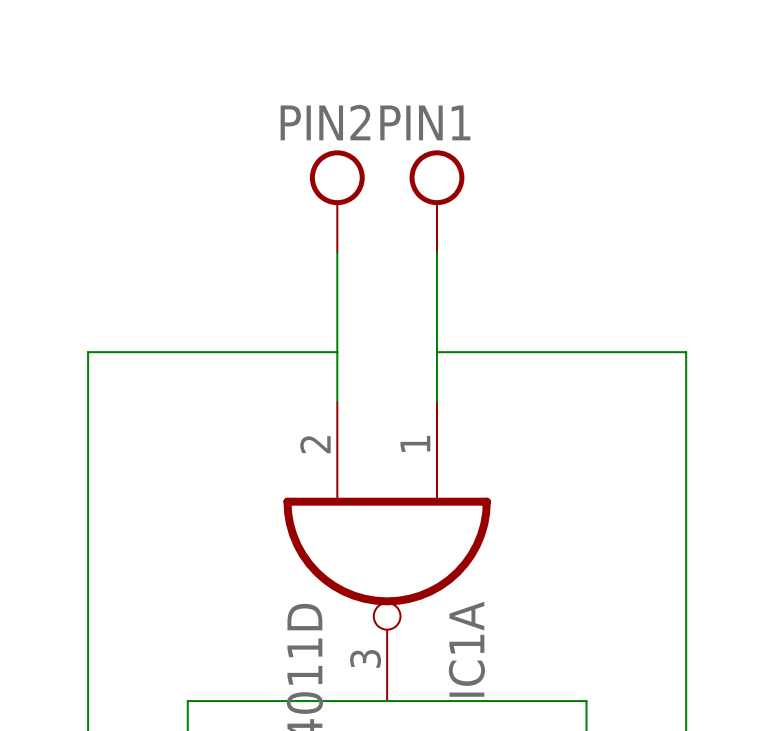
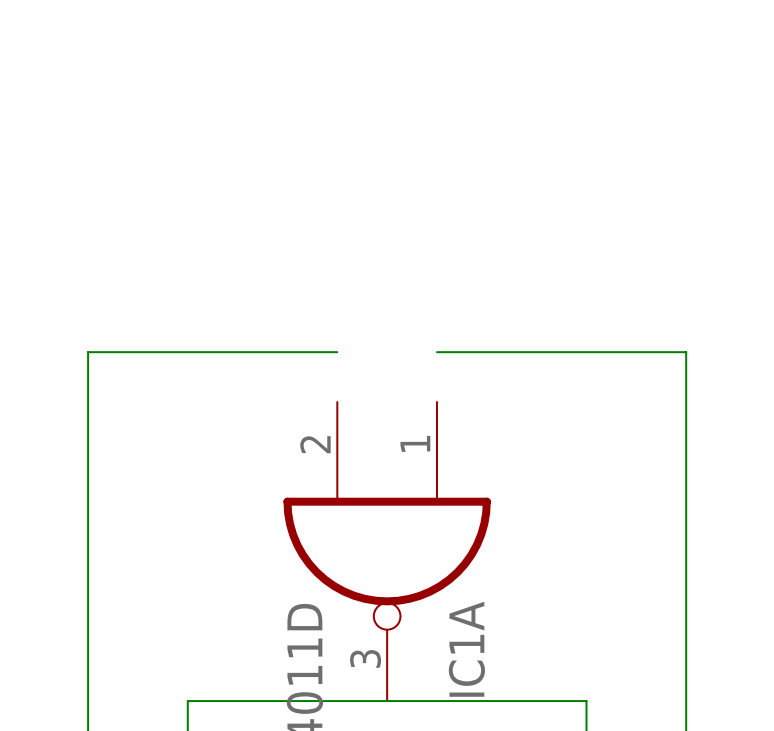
power symbol: PIN2 (337, 201) -> none
power symbol: PIN1 (436, 201) -> none
wire: (337, 252) (337, 402) -> none
wire: (436, 252) (436, 402) -> none

